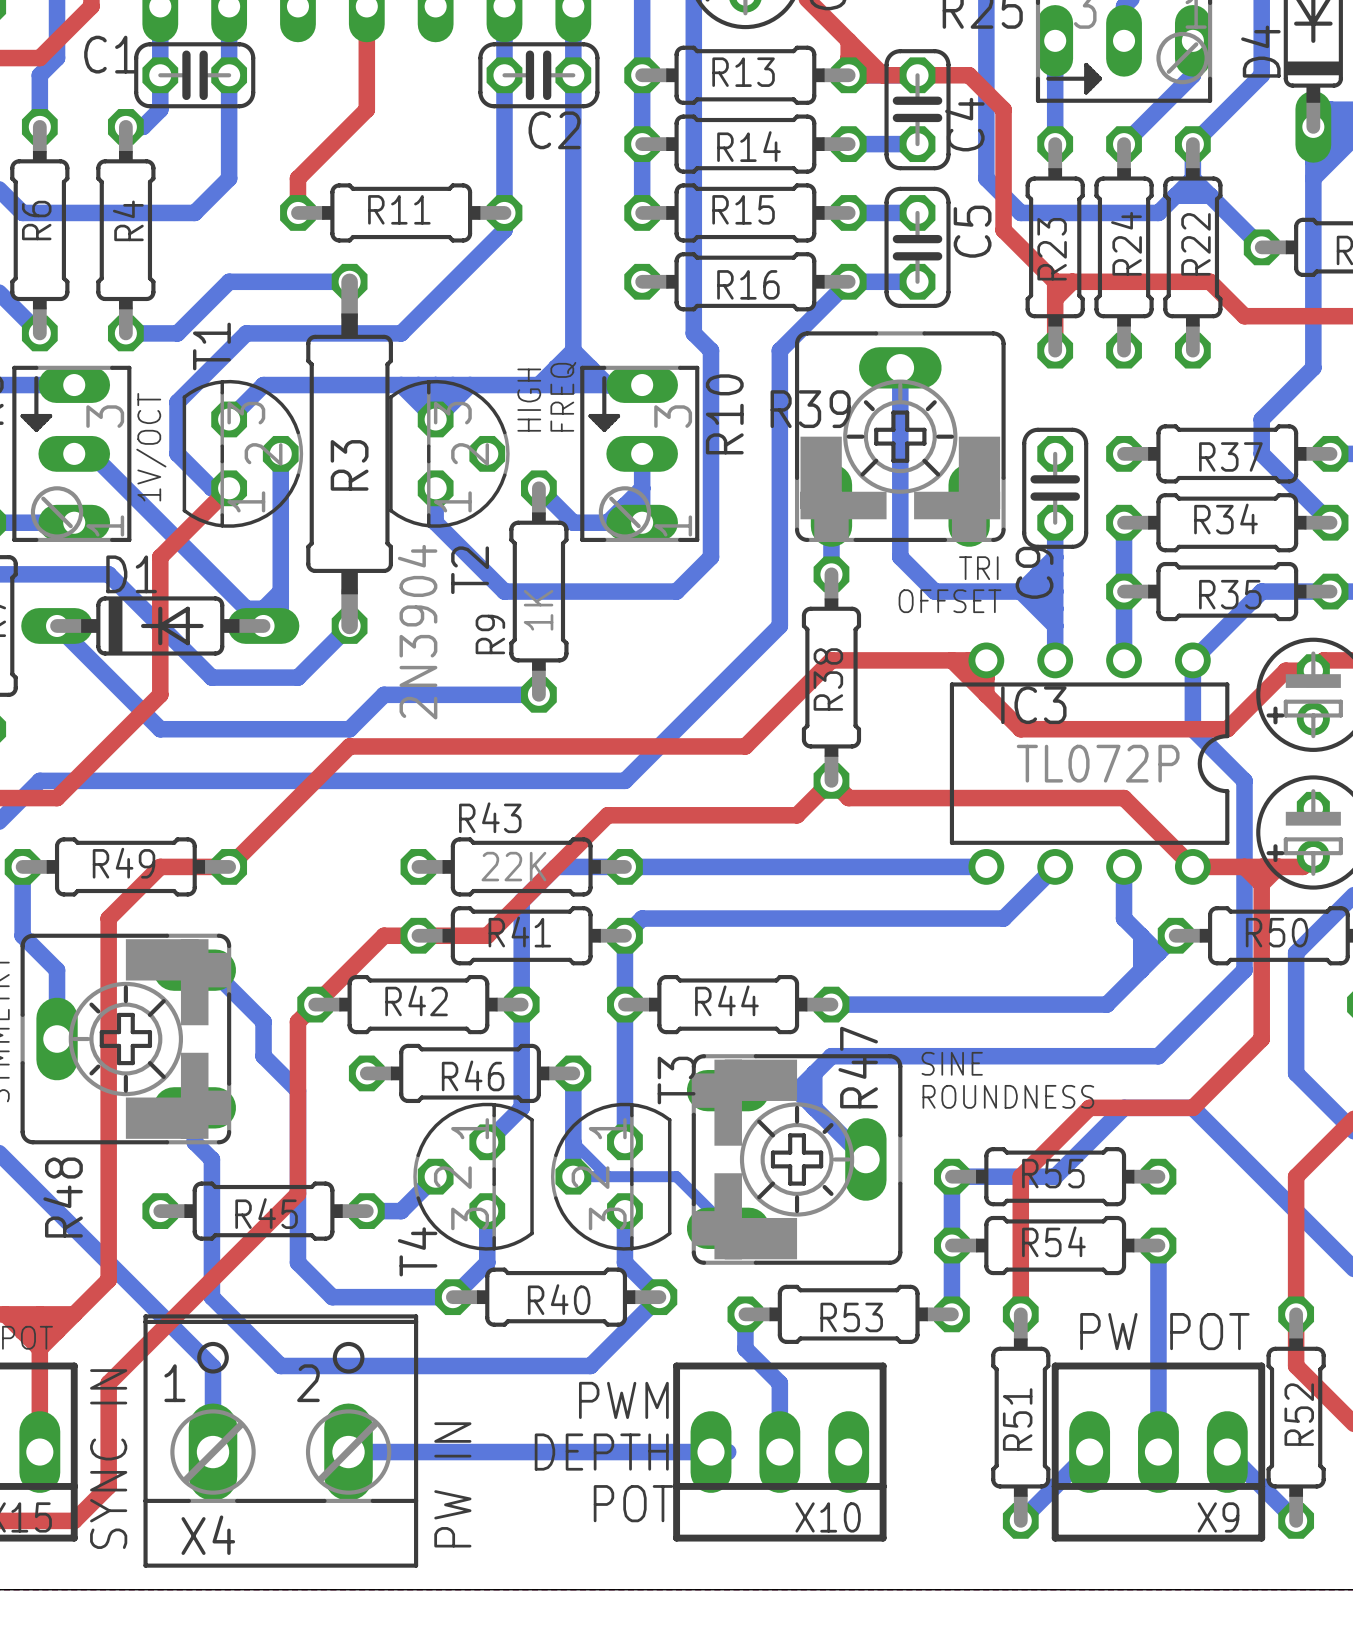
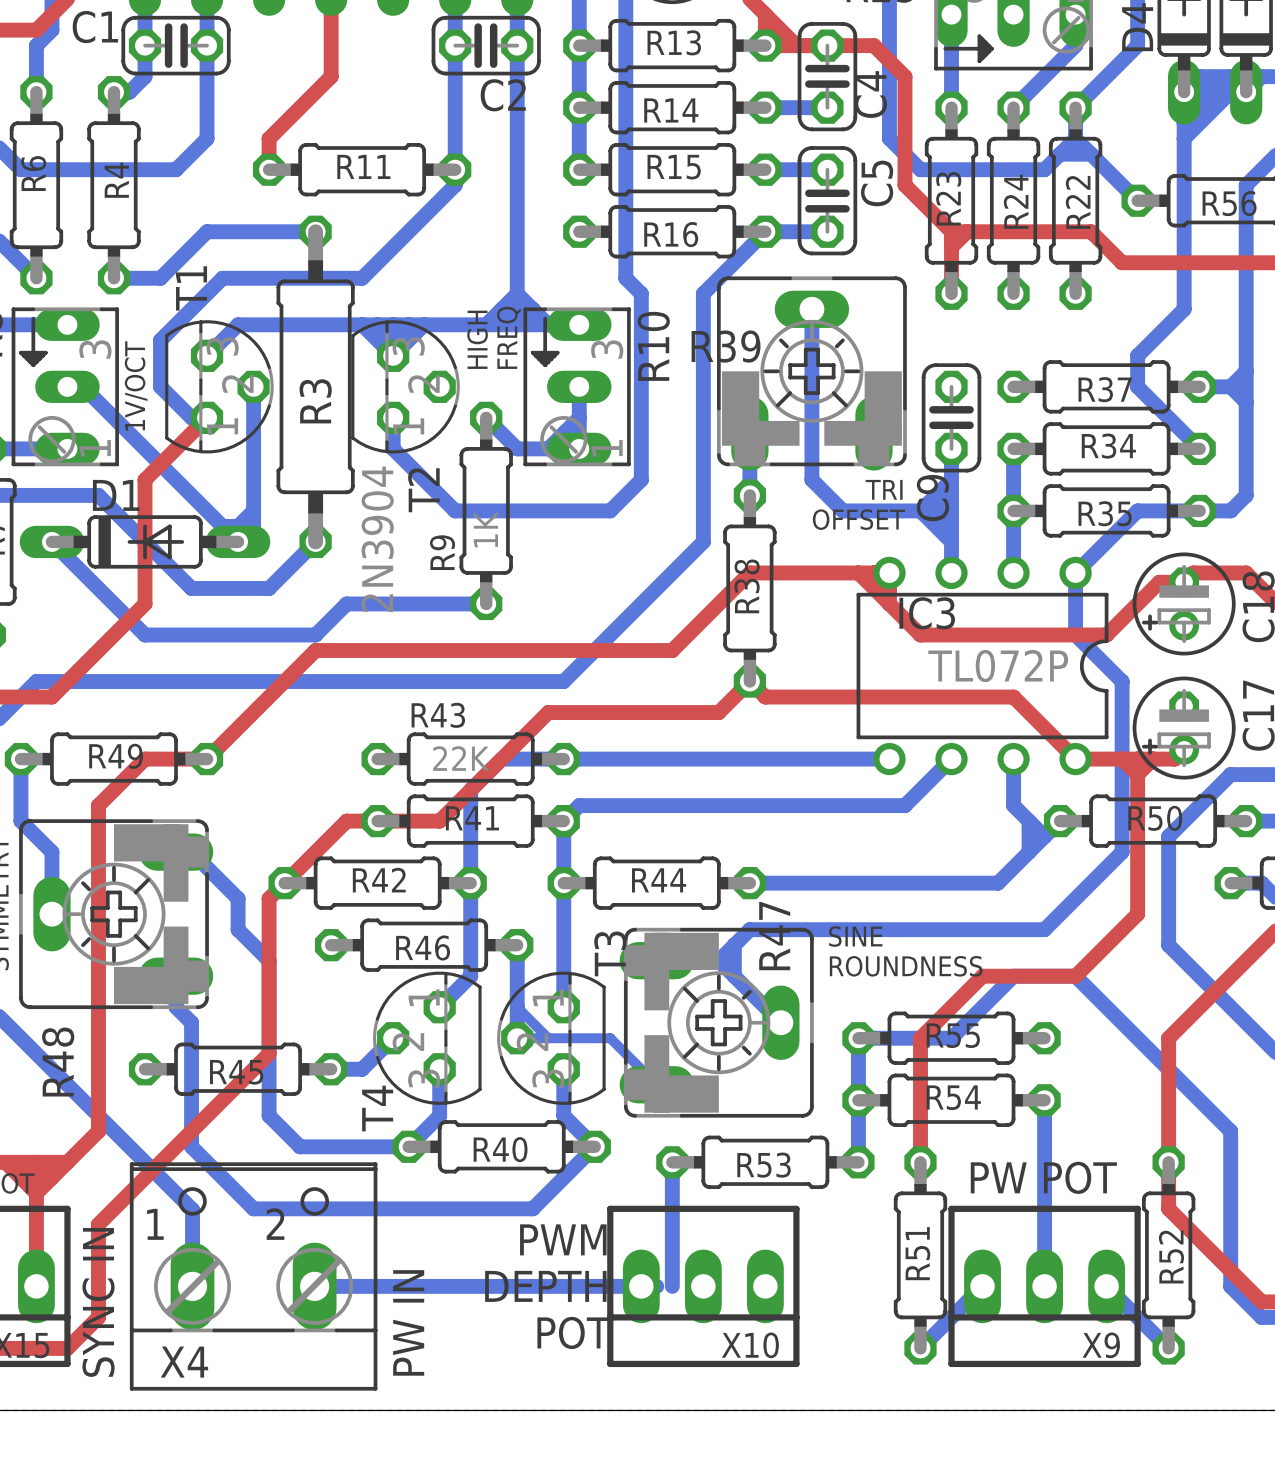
bottom track: (745, 1348) (779, 1383) (779, 1452) -> (672, 1193) (672, 1286)

